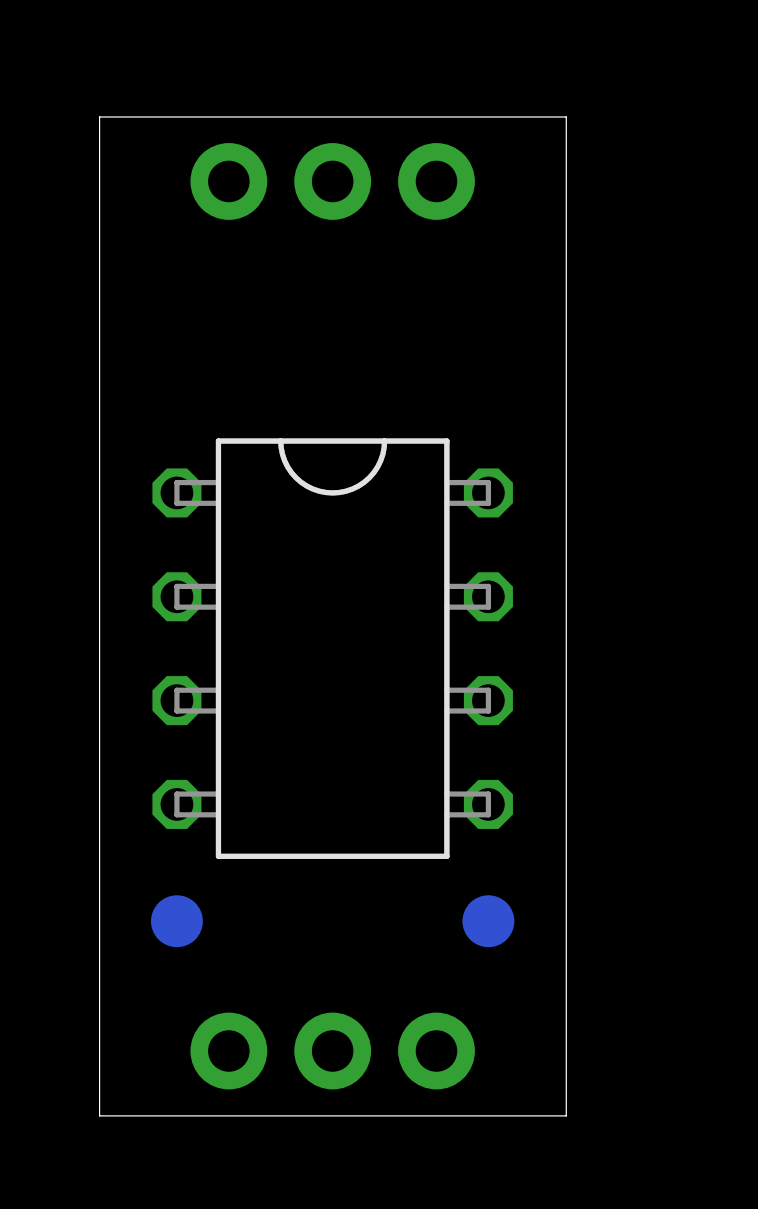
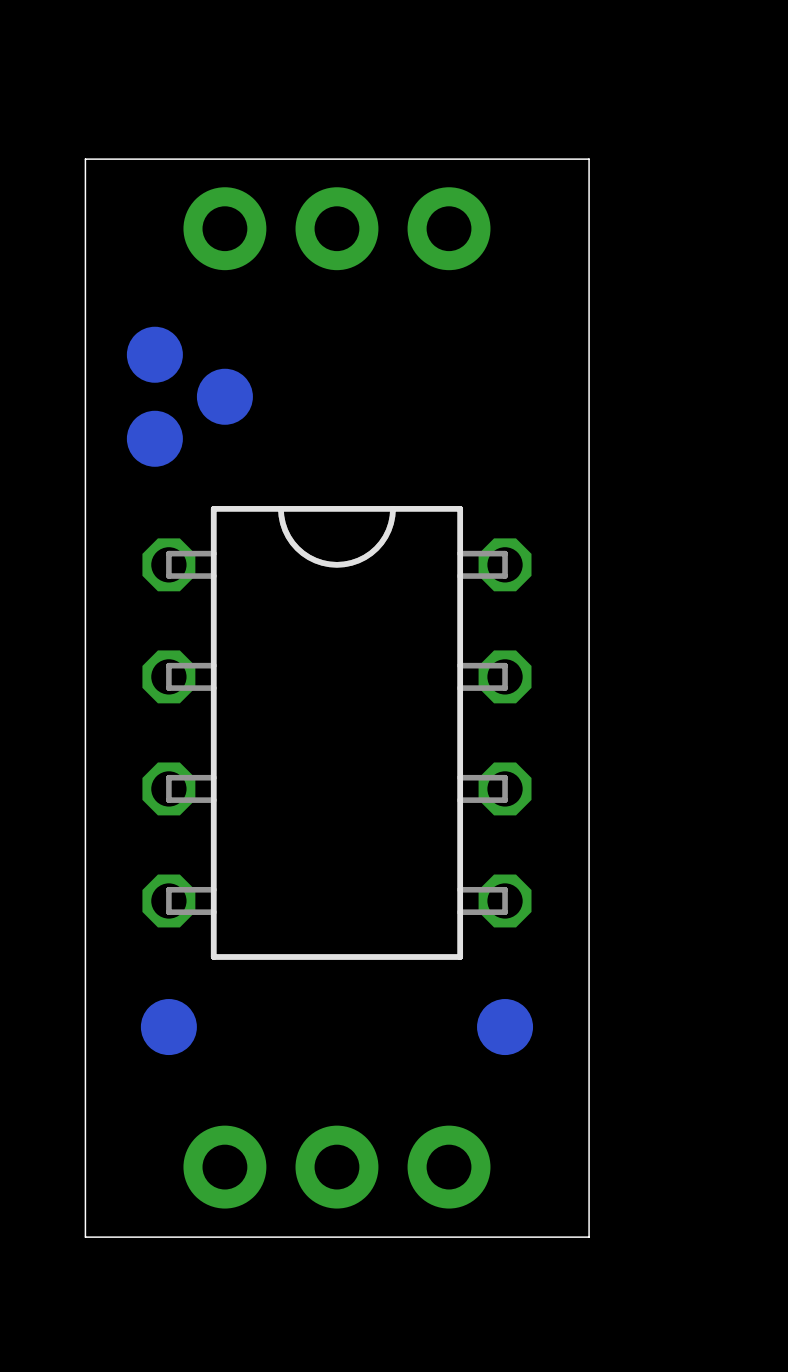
part: none -> (154, 354)
part: none -> (224, 396)
part: none -> (154, 438)

